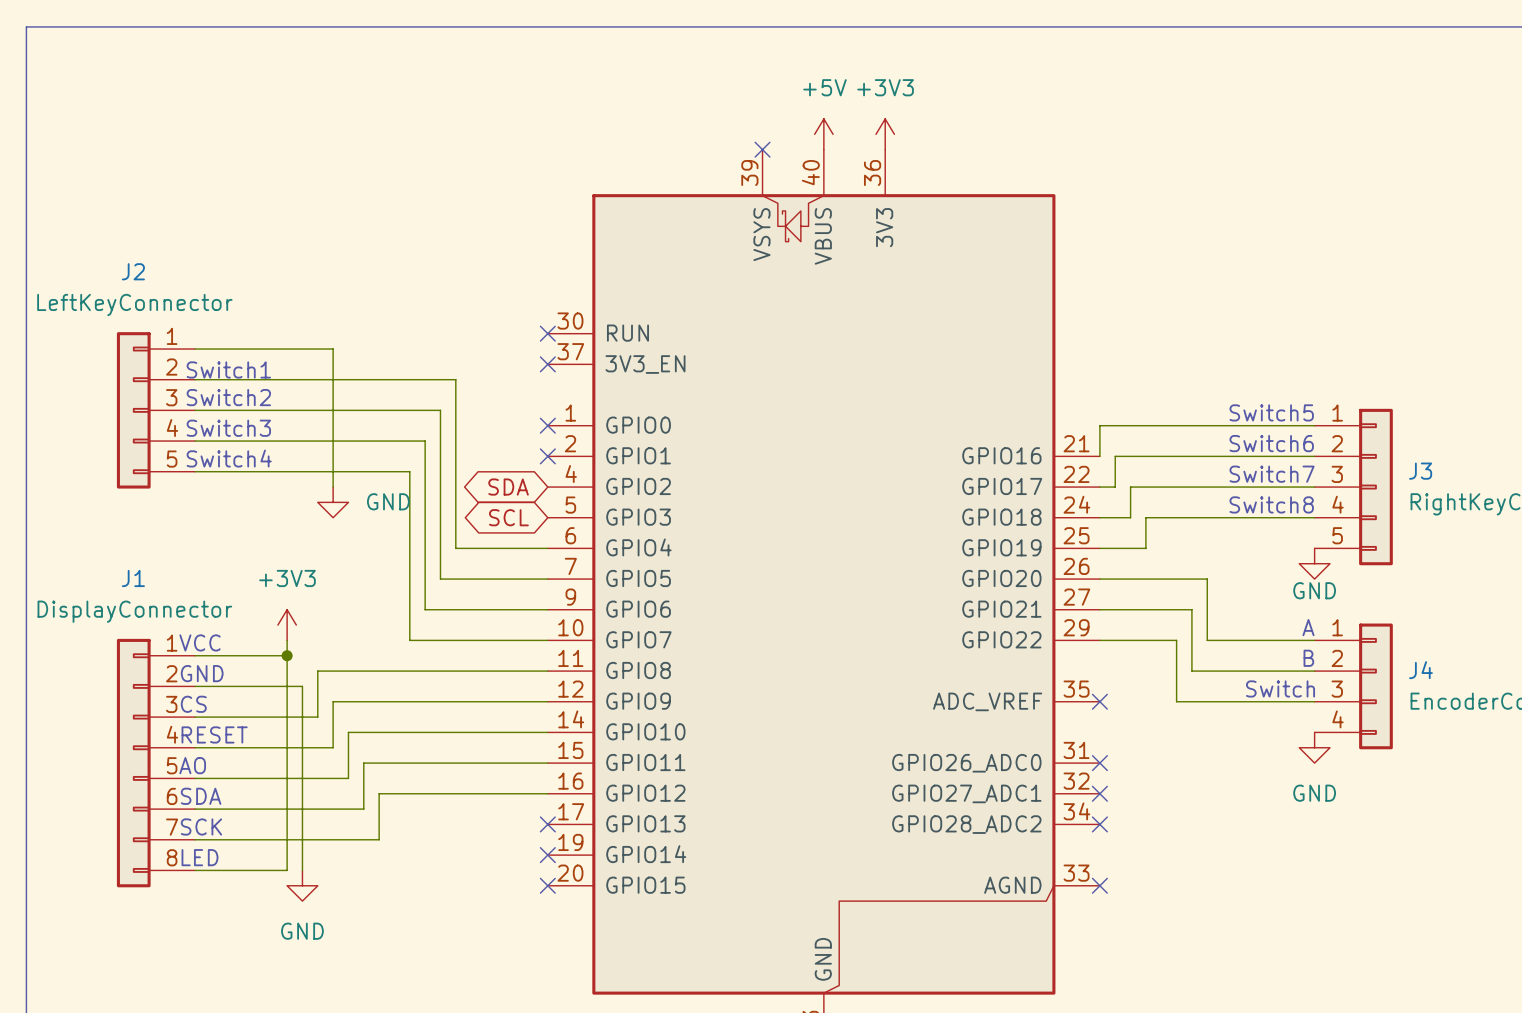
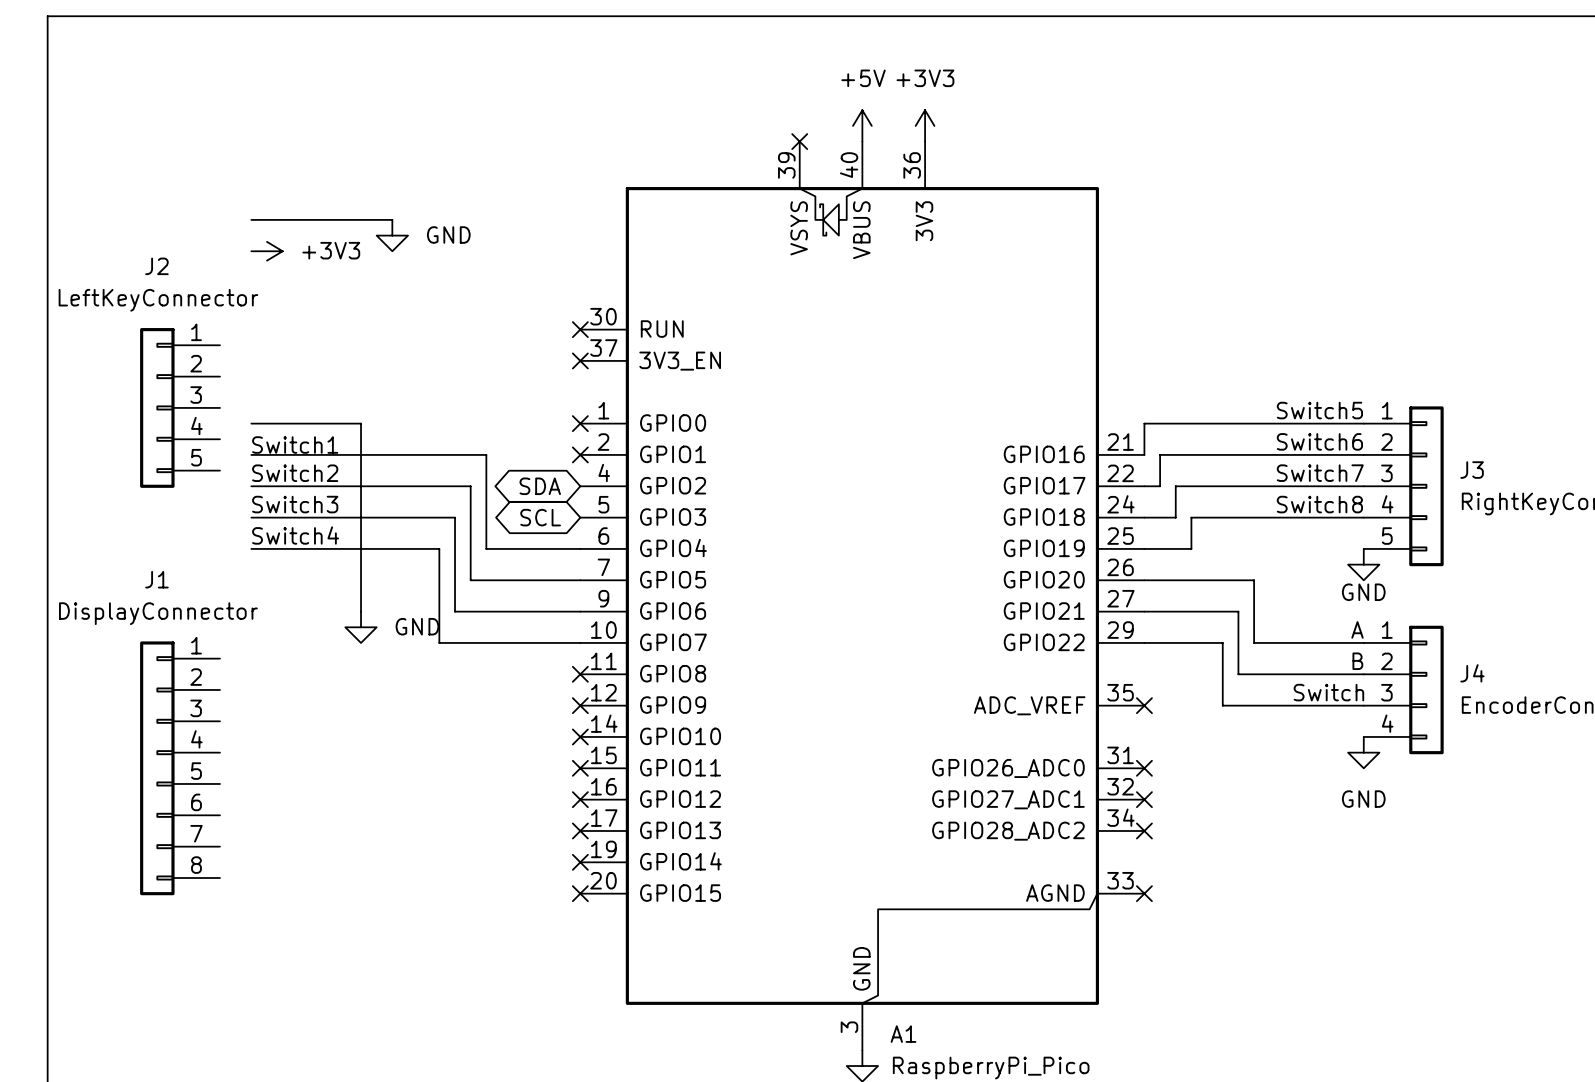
wire: none -> (251, 219) (392, 219)
power symbol: none -> GND (392, 235)
power symbol: none -> +3V3 (267, 251)
wire: (195, 349) (333, 349) (333, 425) -> (251, 423) (361, 423)
text position: Switch1 (228, 369) -> Switch1 (295, 445)
wire: (195, 379) (455, 379) (455, 456) -> (251, 454) (486, 454)
text position: Switch2 (228, 397) -> Switch2 (295, 473)
wire: (195, 410) (440, 410) (440, 487) -> (251, 486) (470, 486)
text position: Switch3 (228, 428) -> Switch3 (295, 504)
wire: (195, 441) (425, 441) (425, 517) -> (251, 517) (455, 517)
text position: Switch4 (229, 458) -> Switch4 (295, 535)
wire: (195, 471) (409, 471) (409, 548) -> (251, 548) (439, 548)
wire: none -> (361, 486) (361, 611)
power symbol position: GND (333, 502) -> GND (361, 627)
power symbol: +3V3 (287, 625) -> none
wire: (287, 640) (287, 870) (195, 870) -> none
text: VCC (200, 642) -> none
wire: (195, 655) (287, 655) -> none
junction: (287, 655) -> none
wire: (547, 671) (317, 671) (317, 717) (195, 717) -> none
no-connect mark: none -> (580, 674)
text: GND (202, 673) -> none
wire: (195, 686) (302, 686) (302, 870) -> none
wire: (547, 701) (333, 701) (333, 747) (195, 747) -> none
no-connect mark: none -> (580, 705)
text: CS (193, 704) -> none
wire: (547, 732) (348, 732) (348, 778) (195, 778) -> none
no-connect mark: none -> (580, 736)
text: RESET (214, 734) -> none
wire: (547, 763) (363, 763) (363, 809) (195, 809) -> none
no-connect mark: none -> (580, 768)
text: AO (192, 765) -> none
wire: (547, 793) (379, 793) (379, 839) (195, 839) -> none
no-connect mark: none -> (580, 799)
text: SDA (201, 796) -> none
text: SCK (201, 826) -> none
text: LED (199, 857) -> none
power symbol: GND (302, 885) -> none

